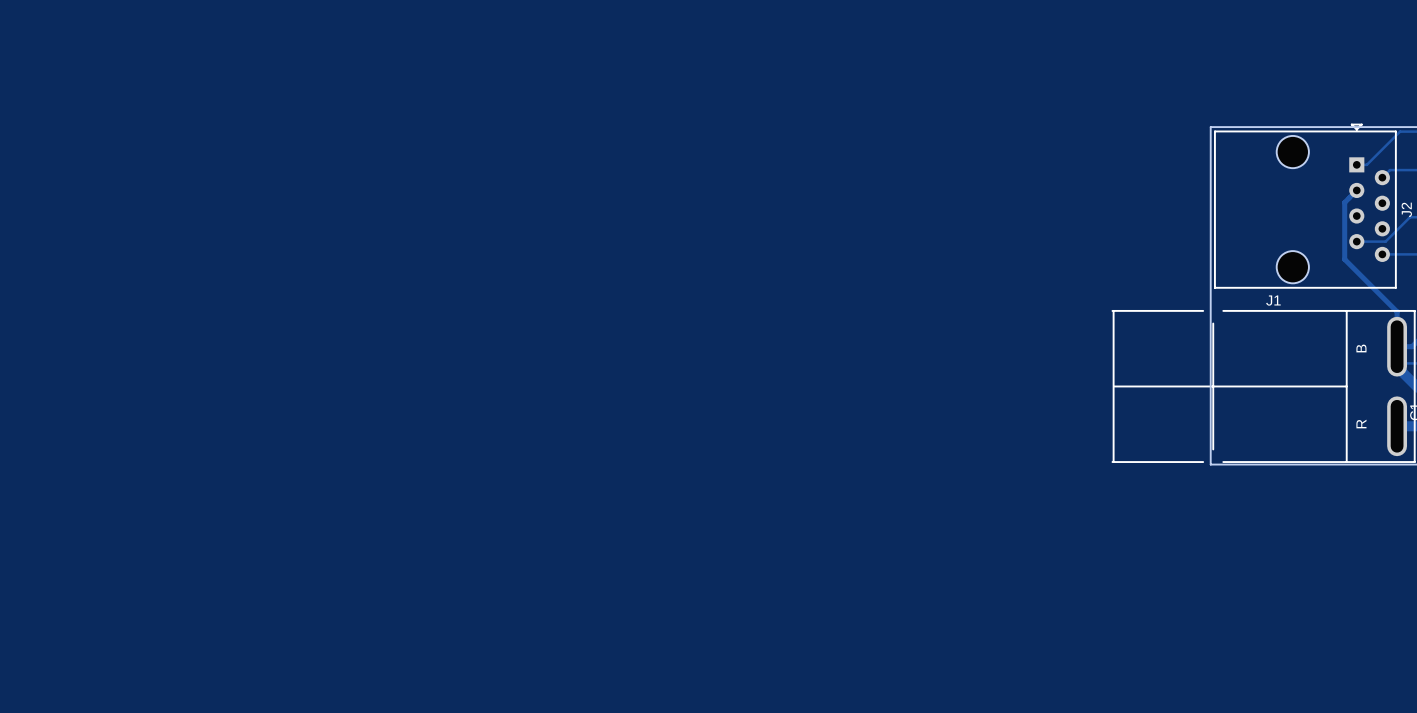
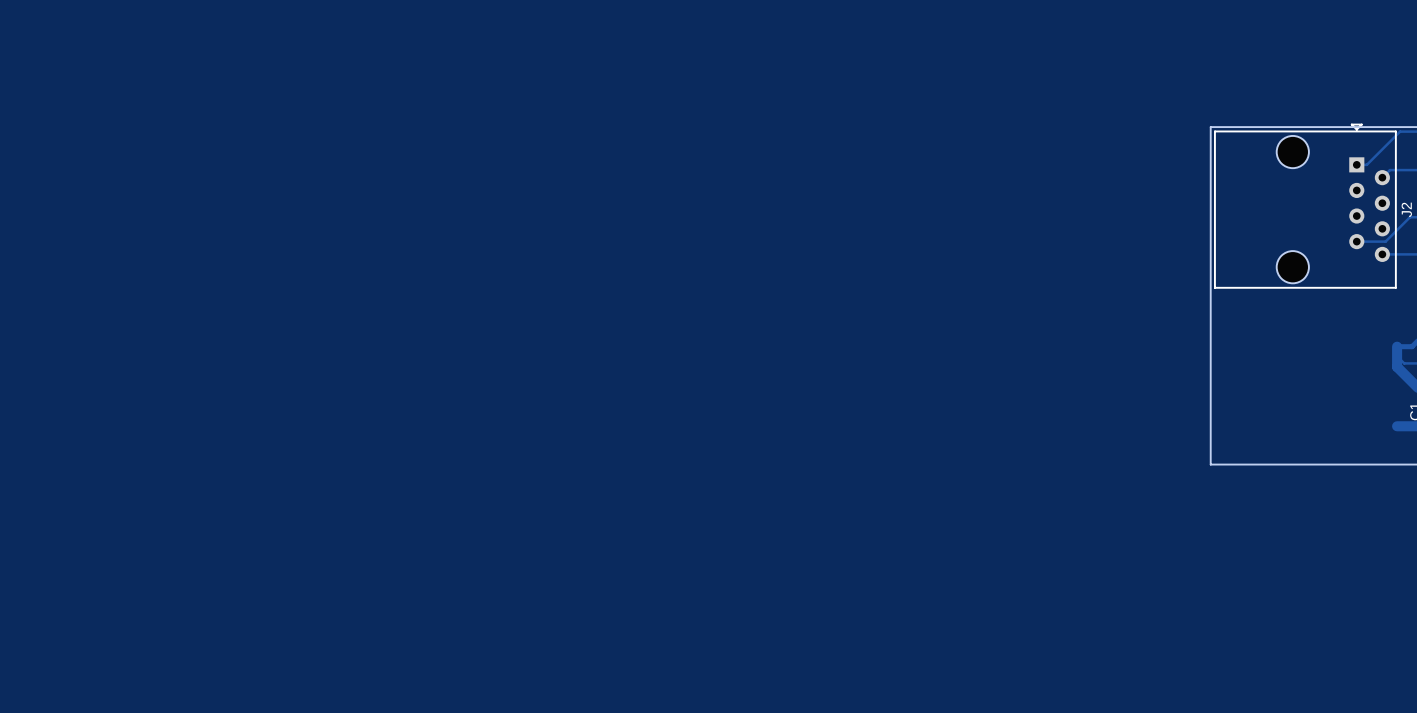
track: (1356, 190) (1344, 202) (1344, 259) (1397, 311) (1397, 346) -> none
J1: (1263, 386) -> none

